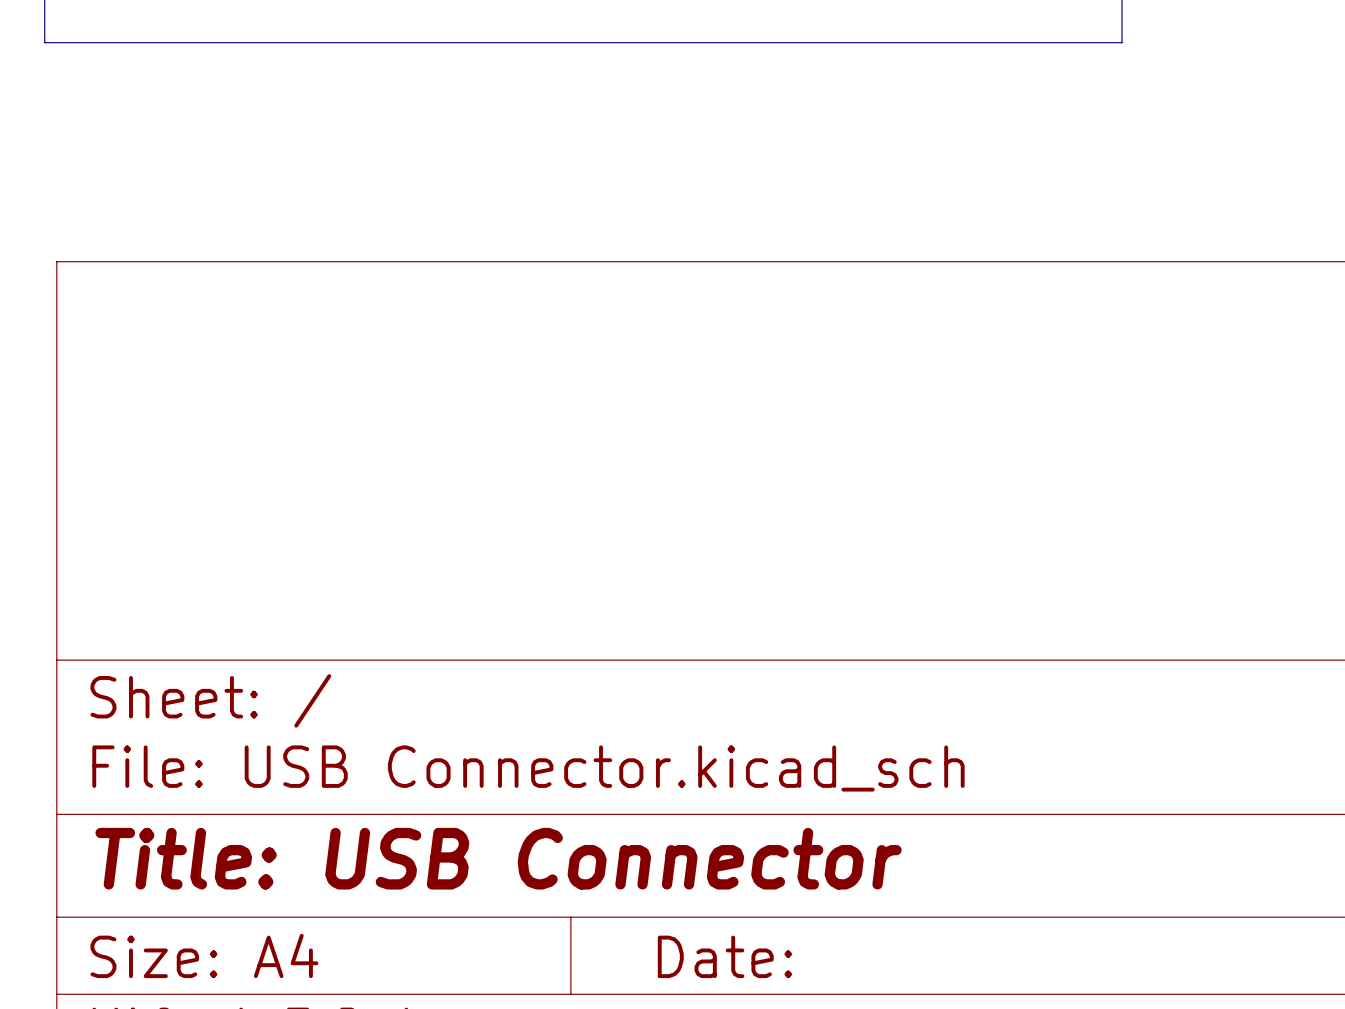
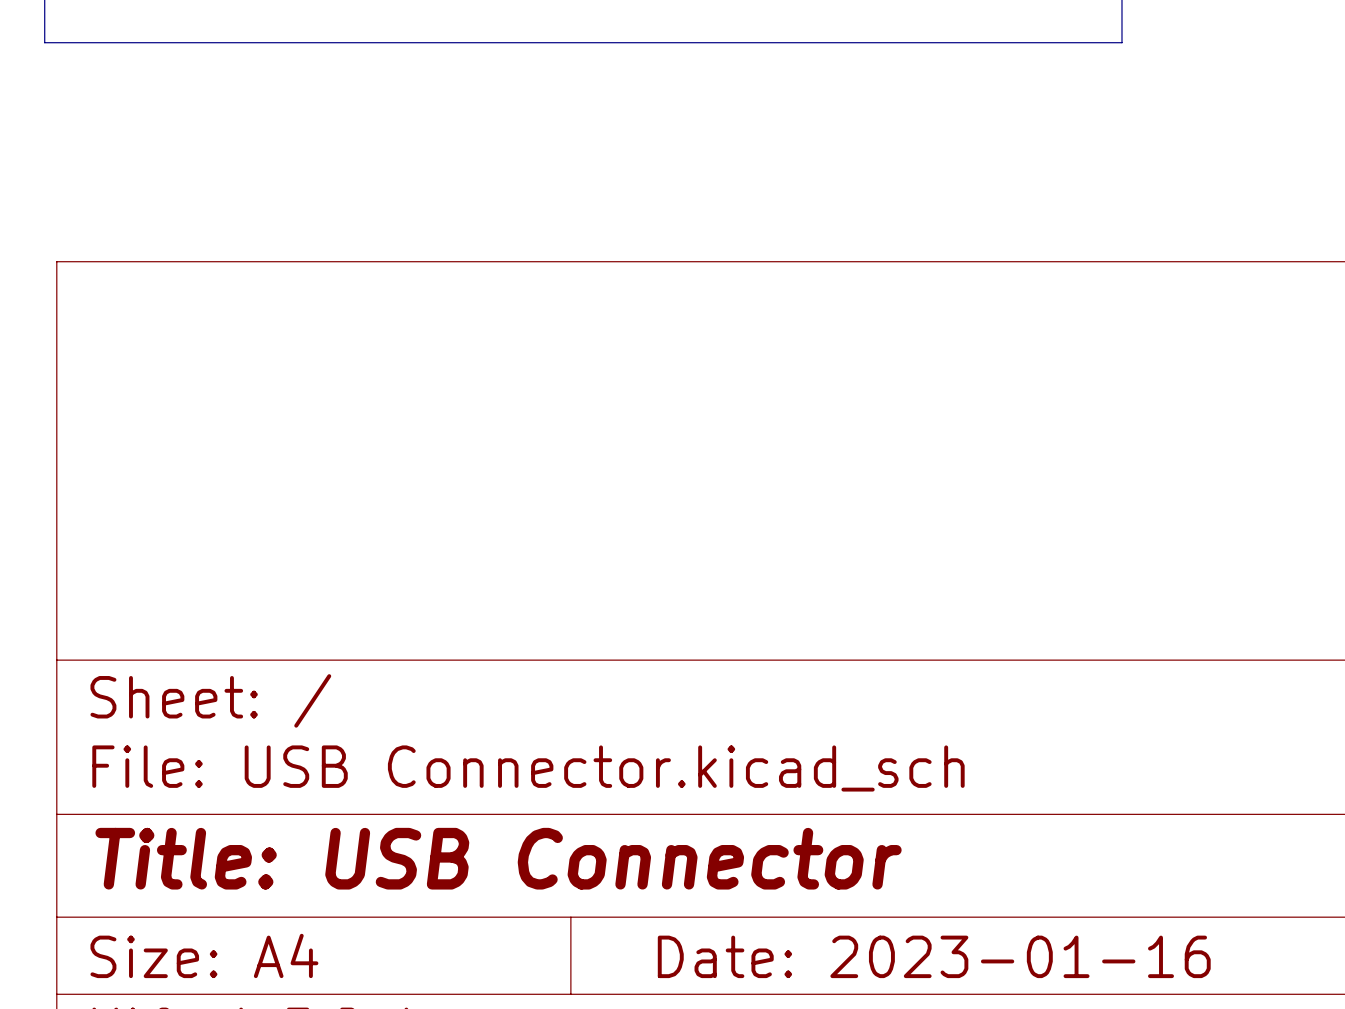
title block: Date: (724, 956) -> Date: 2023-01-16 (934, 956)

